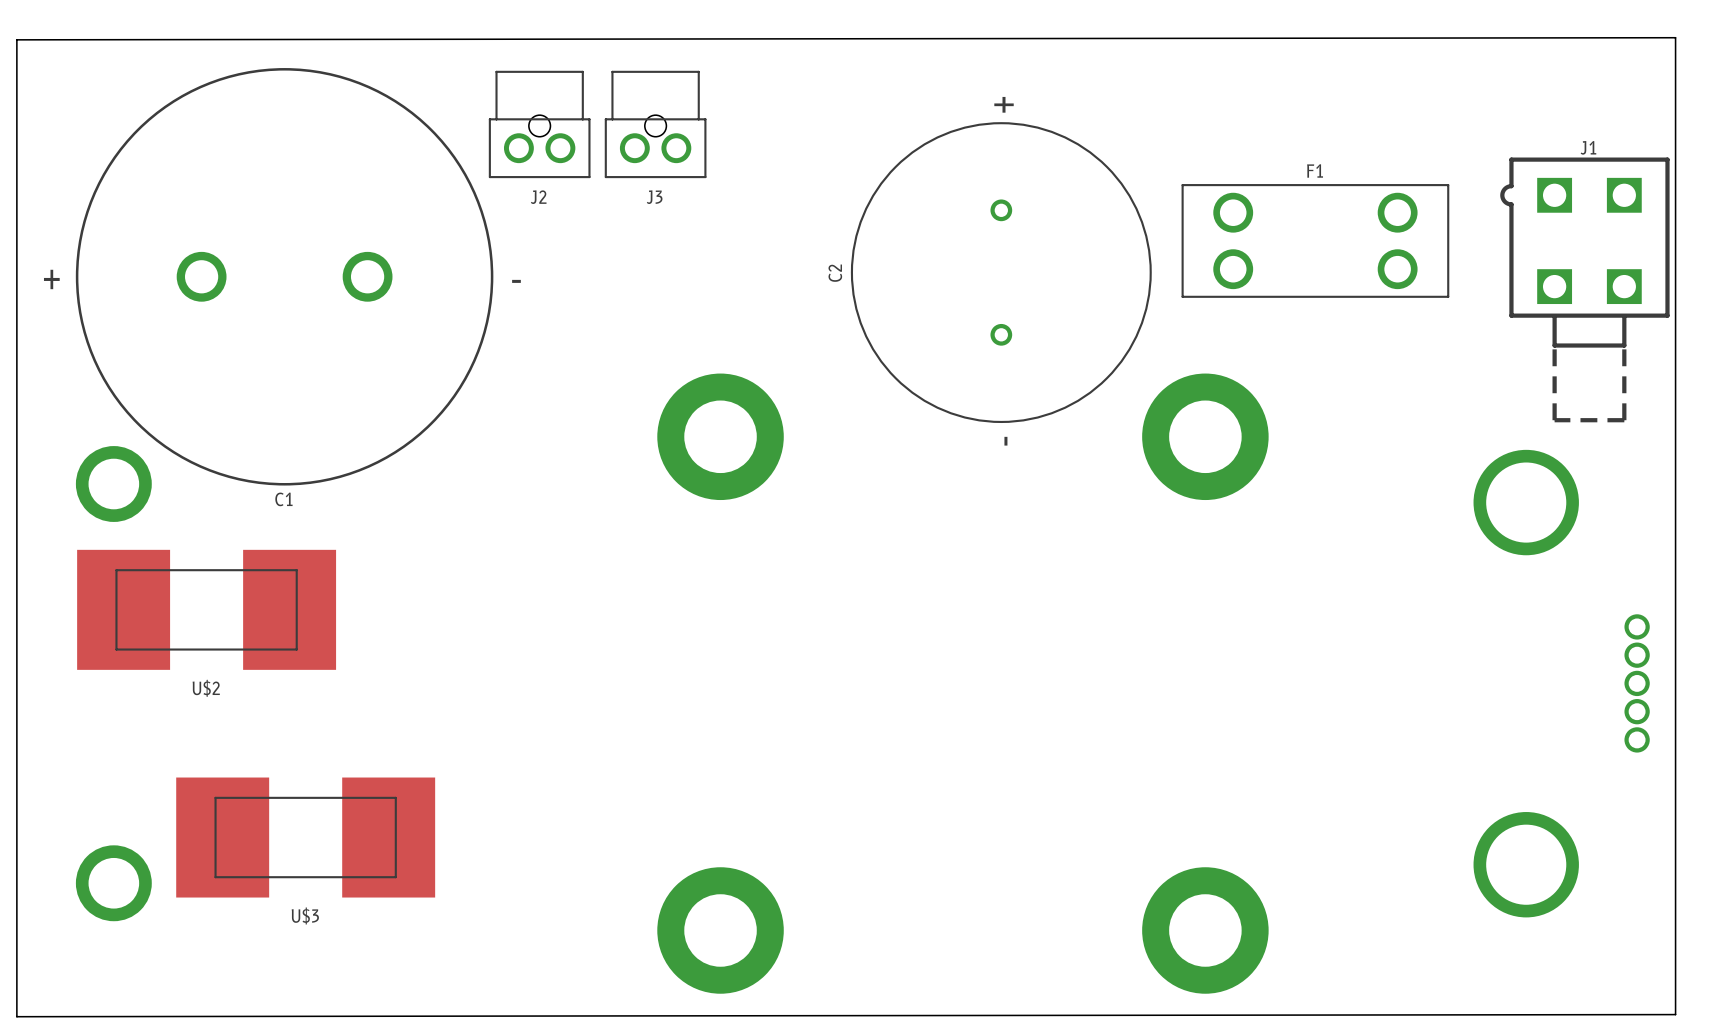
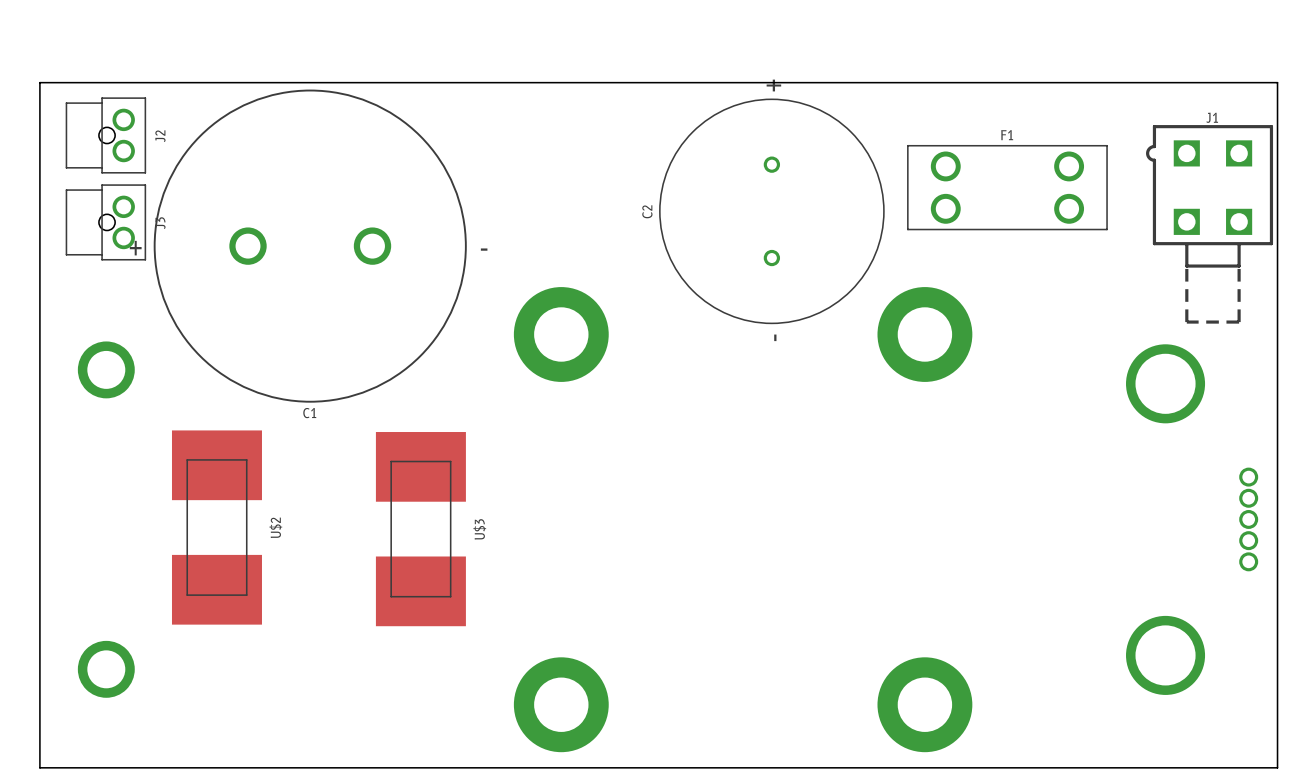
board edge: (1675, 100) (1675, 37) (16, 39) (16, 1016) (1675, 1014) -> (1277, 82) (39, 82) (39, 767) (1277, 767)
J2 rotation: 0° (539, 124) -> 90° counterclockwise (105, 135)
J2 position: (539, 124) -> (105, 135)
J3 rotation: 0° (655, 124) -> 90° counterclockwise (105, 222)
J3 position: (655, 124) -> (105, 222)
C1 position: (284, 276) -> (310, 246)
U$2 rotation: 0° (206, 609) -> 90° clockwise (216, 527)
U$2 name position: U$2 (206, 688) -> U$2 (275, 527)
U$3 rotation: 0° (305, 837) -> 90° clockwise (420, 529)
U$3 position: (305, 837) -> (420, 529)
U$3 name position: U$3 (305, 915) -> U$3 (479, 529)

